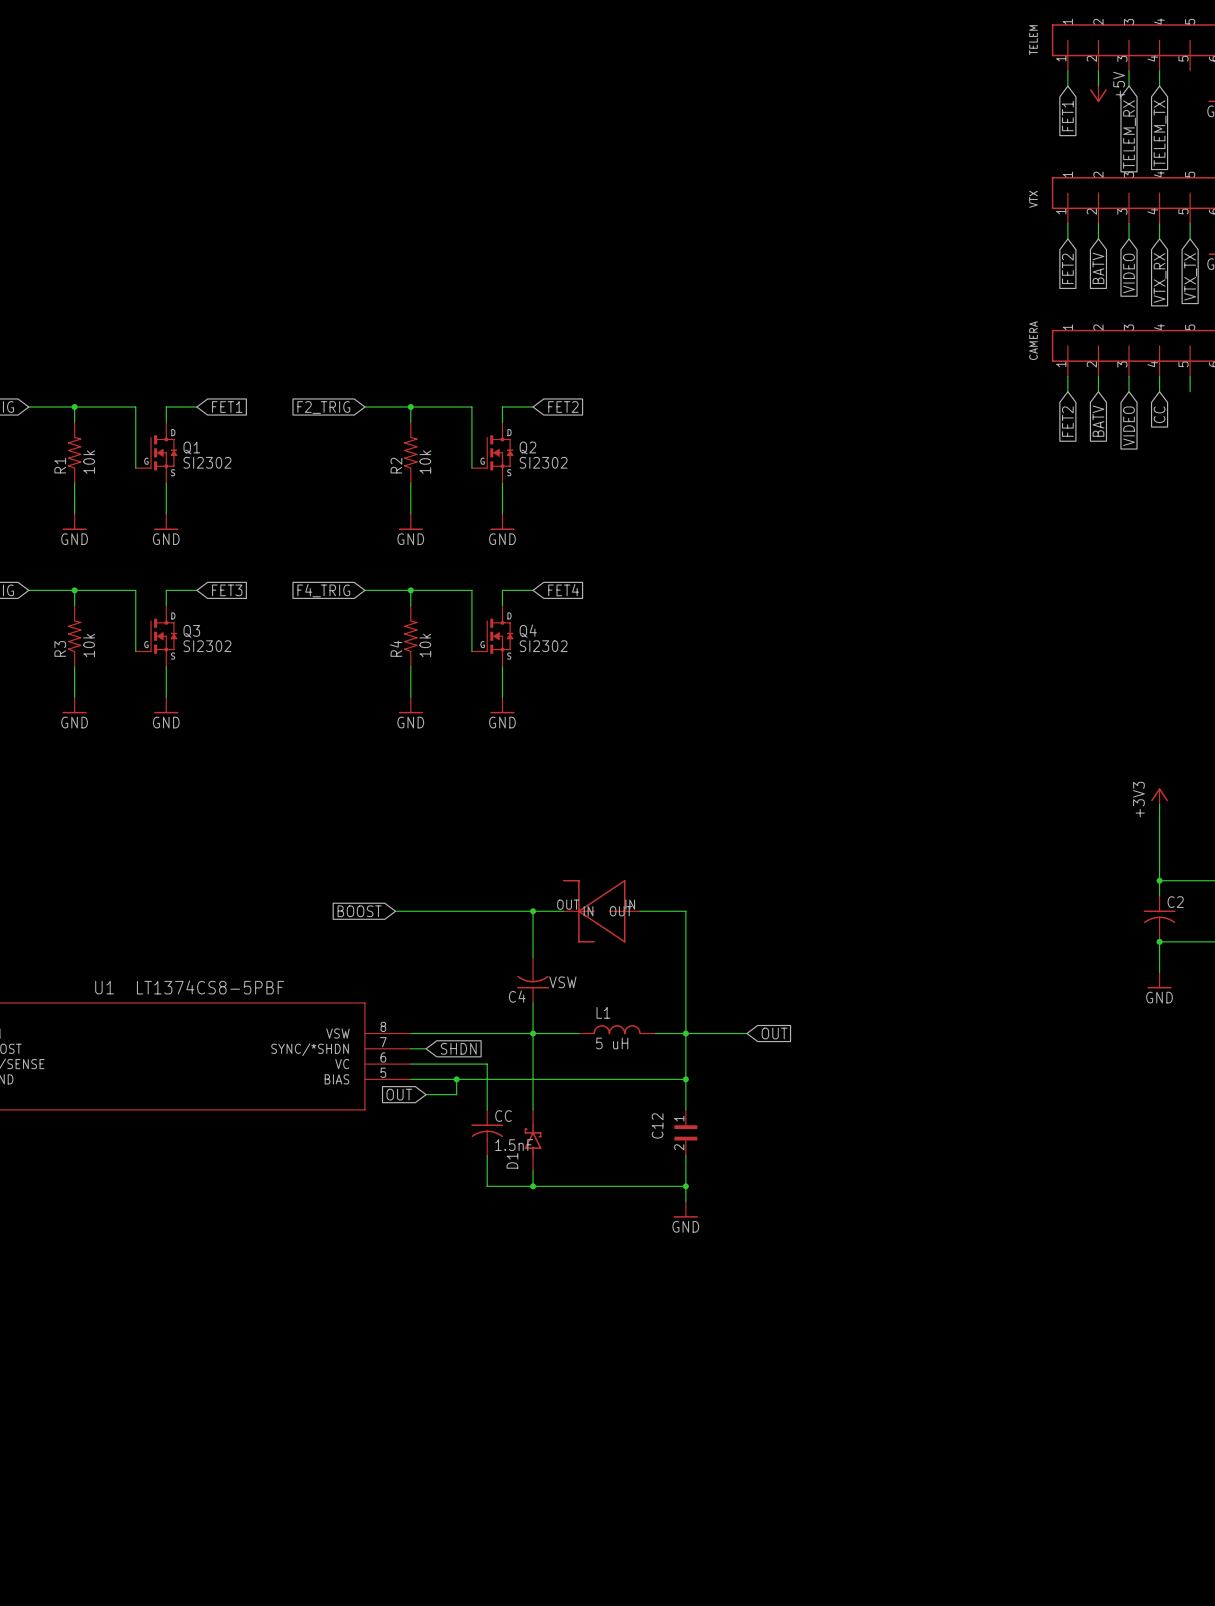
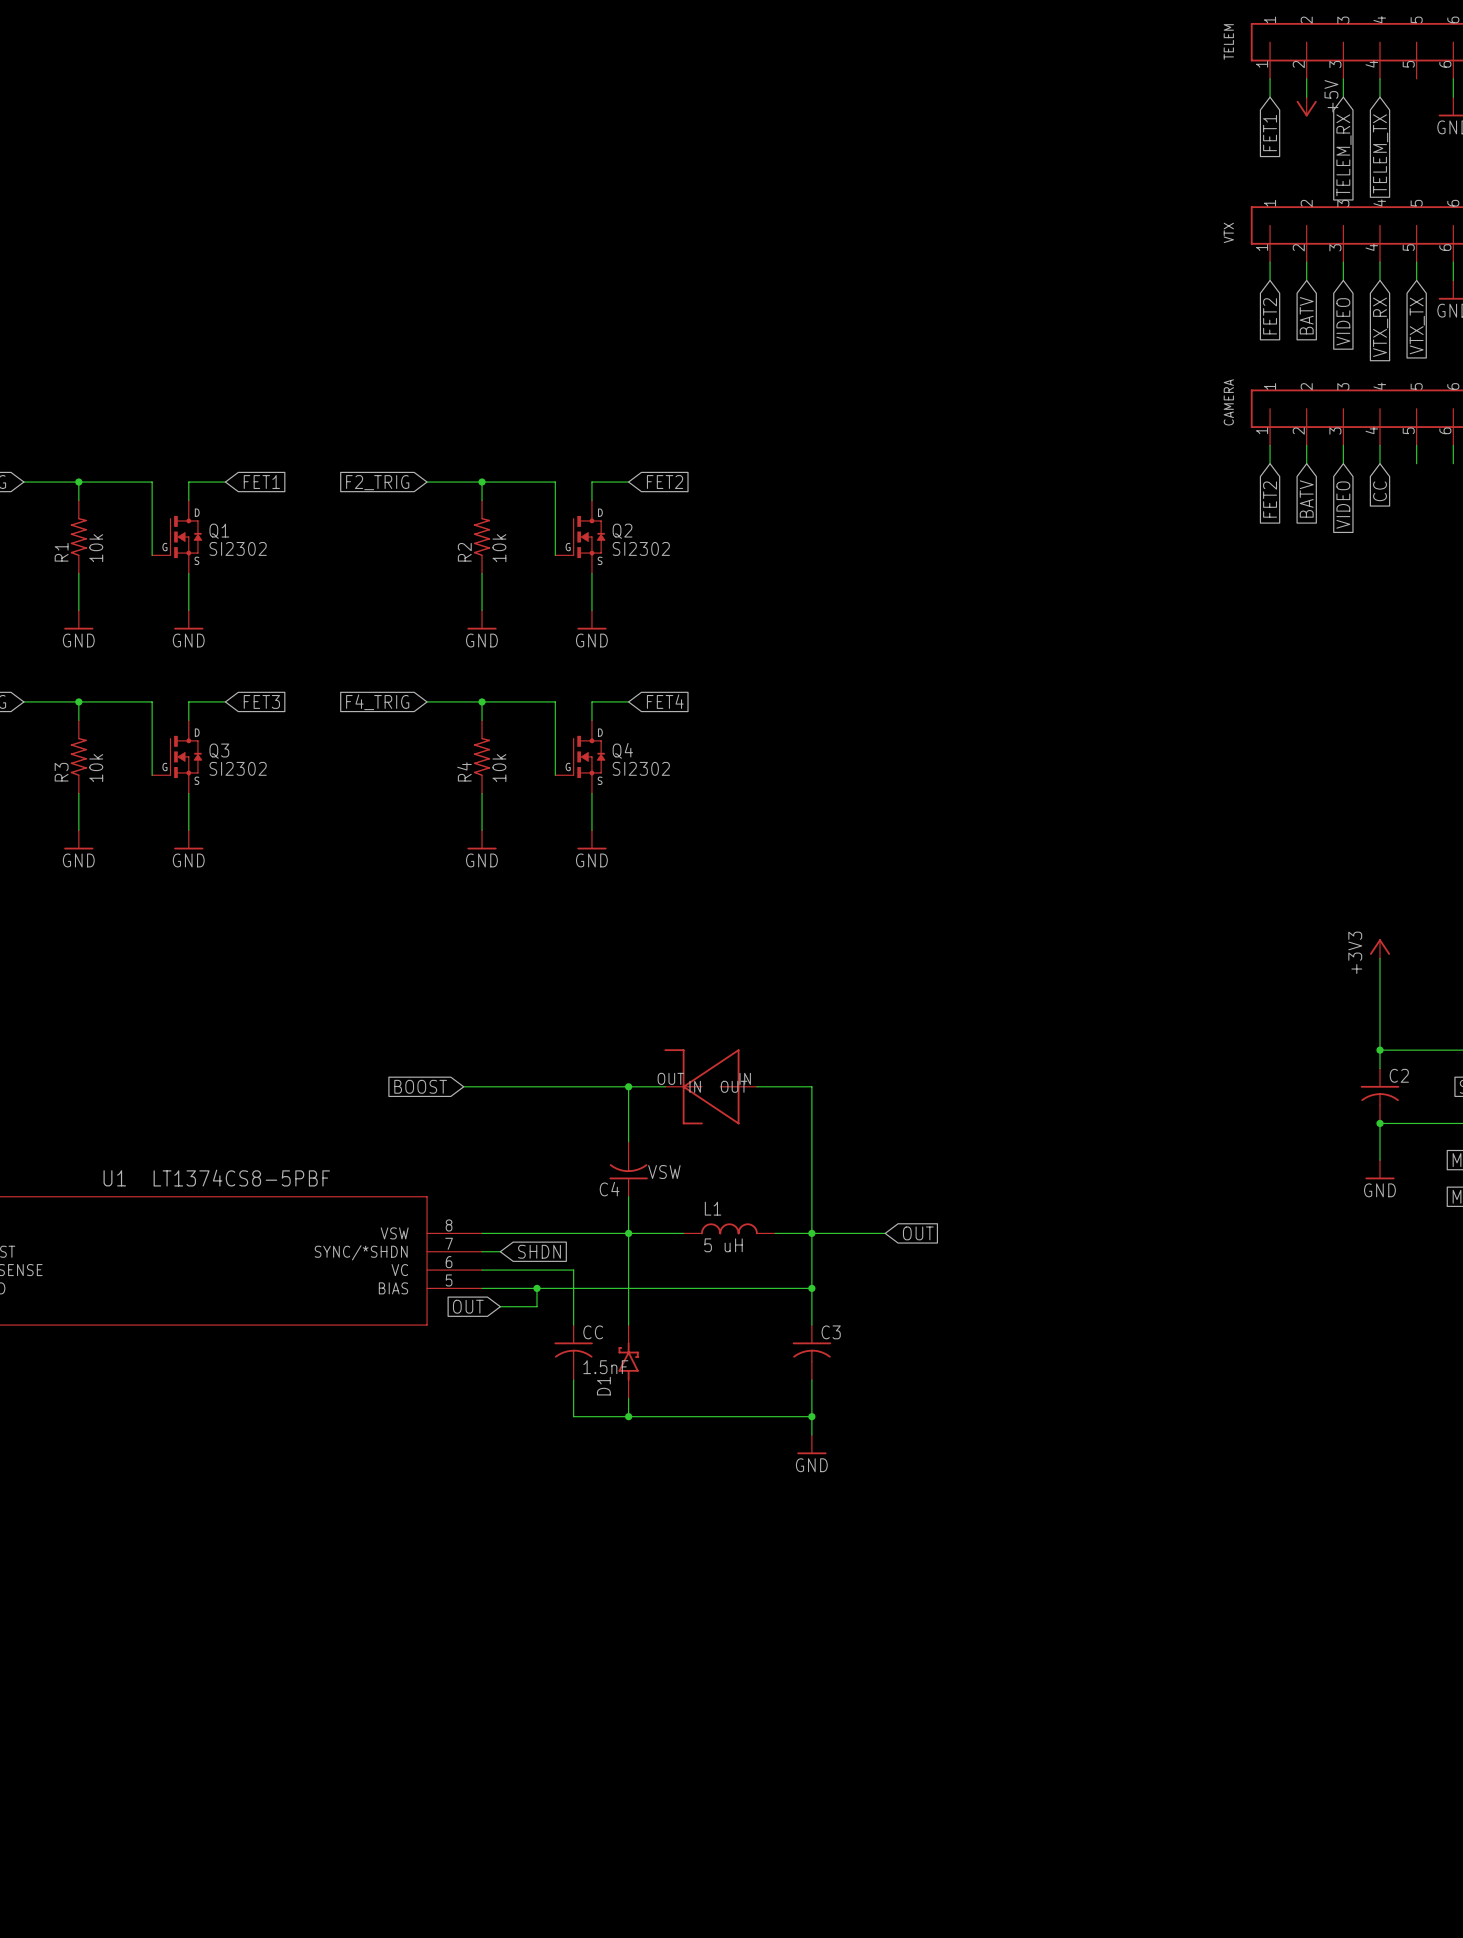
C12: (685, 1132) -> none
C3: none -> (811, 1352)

